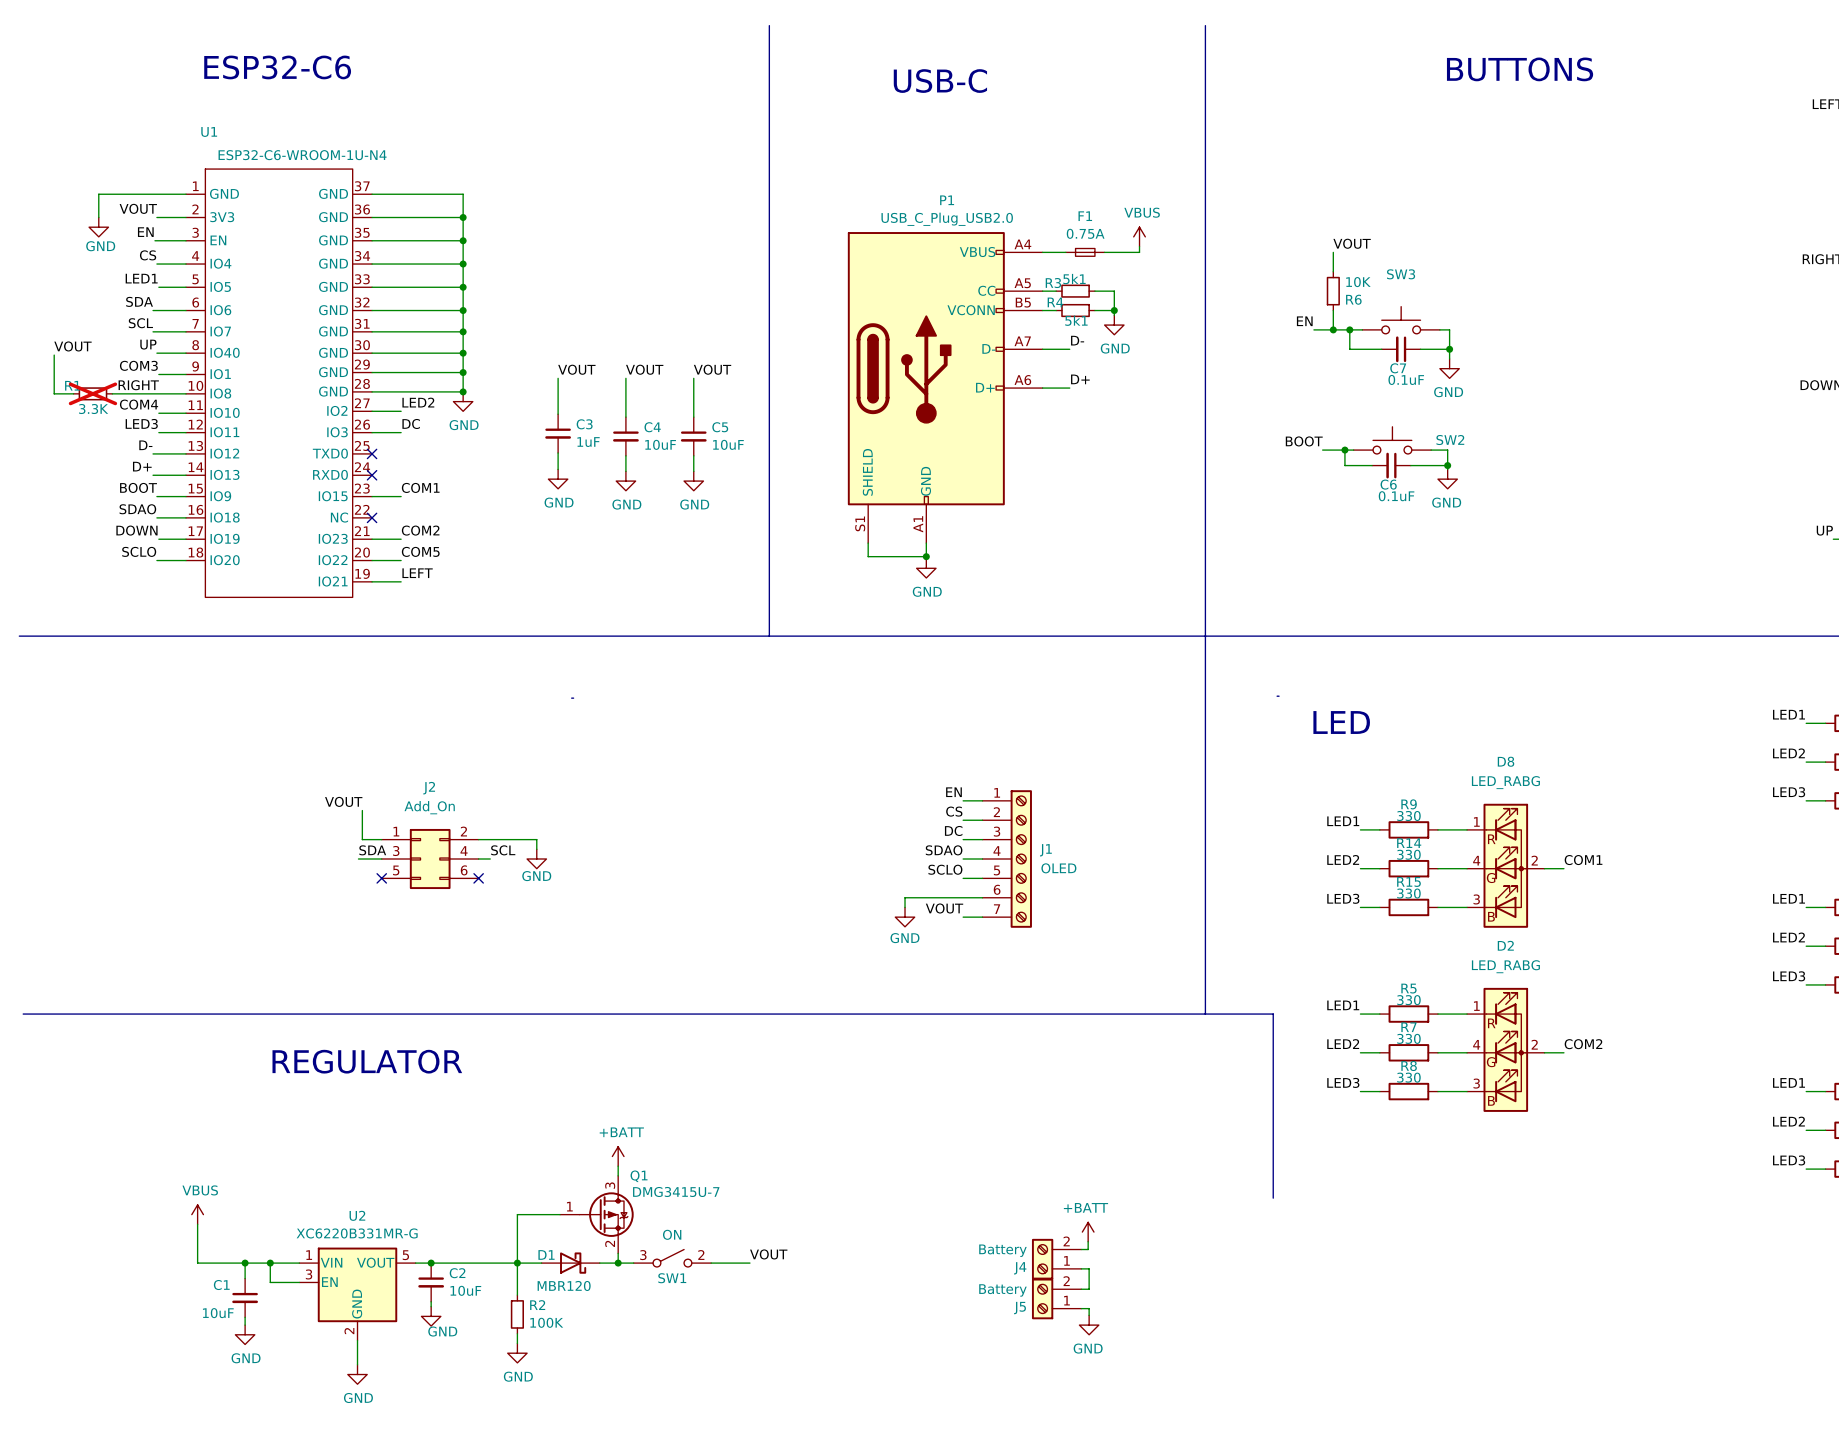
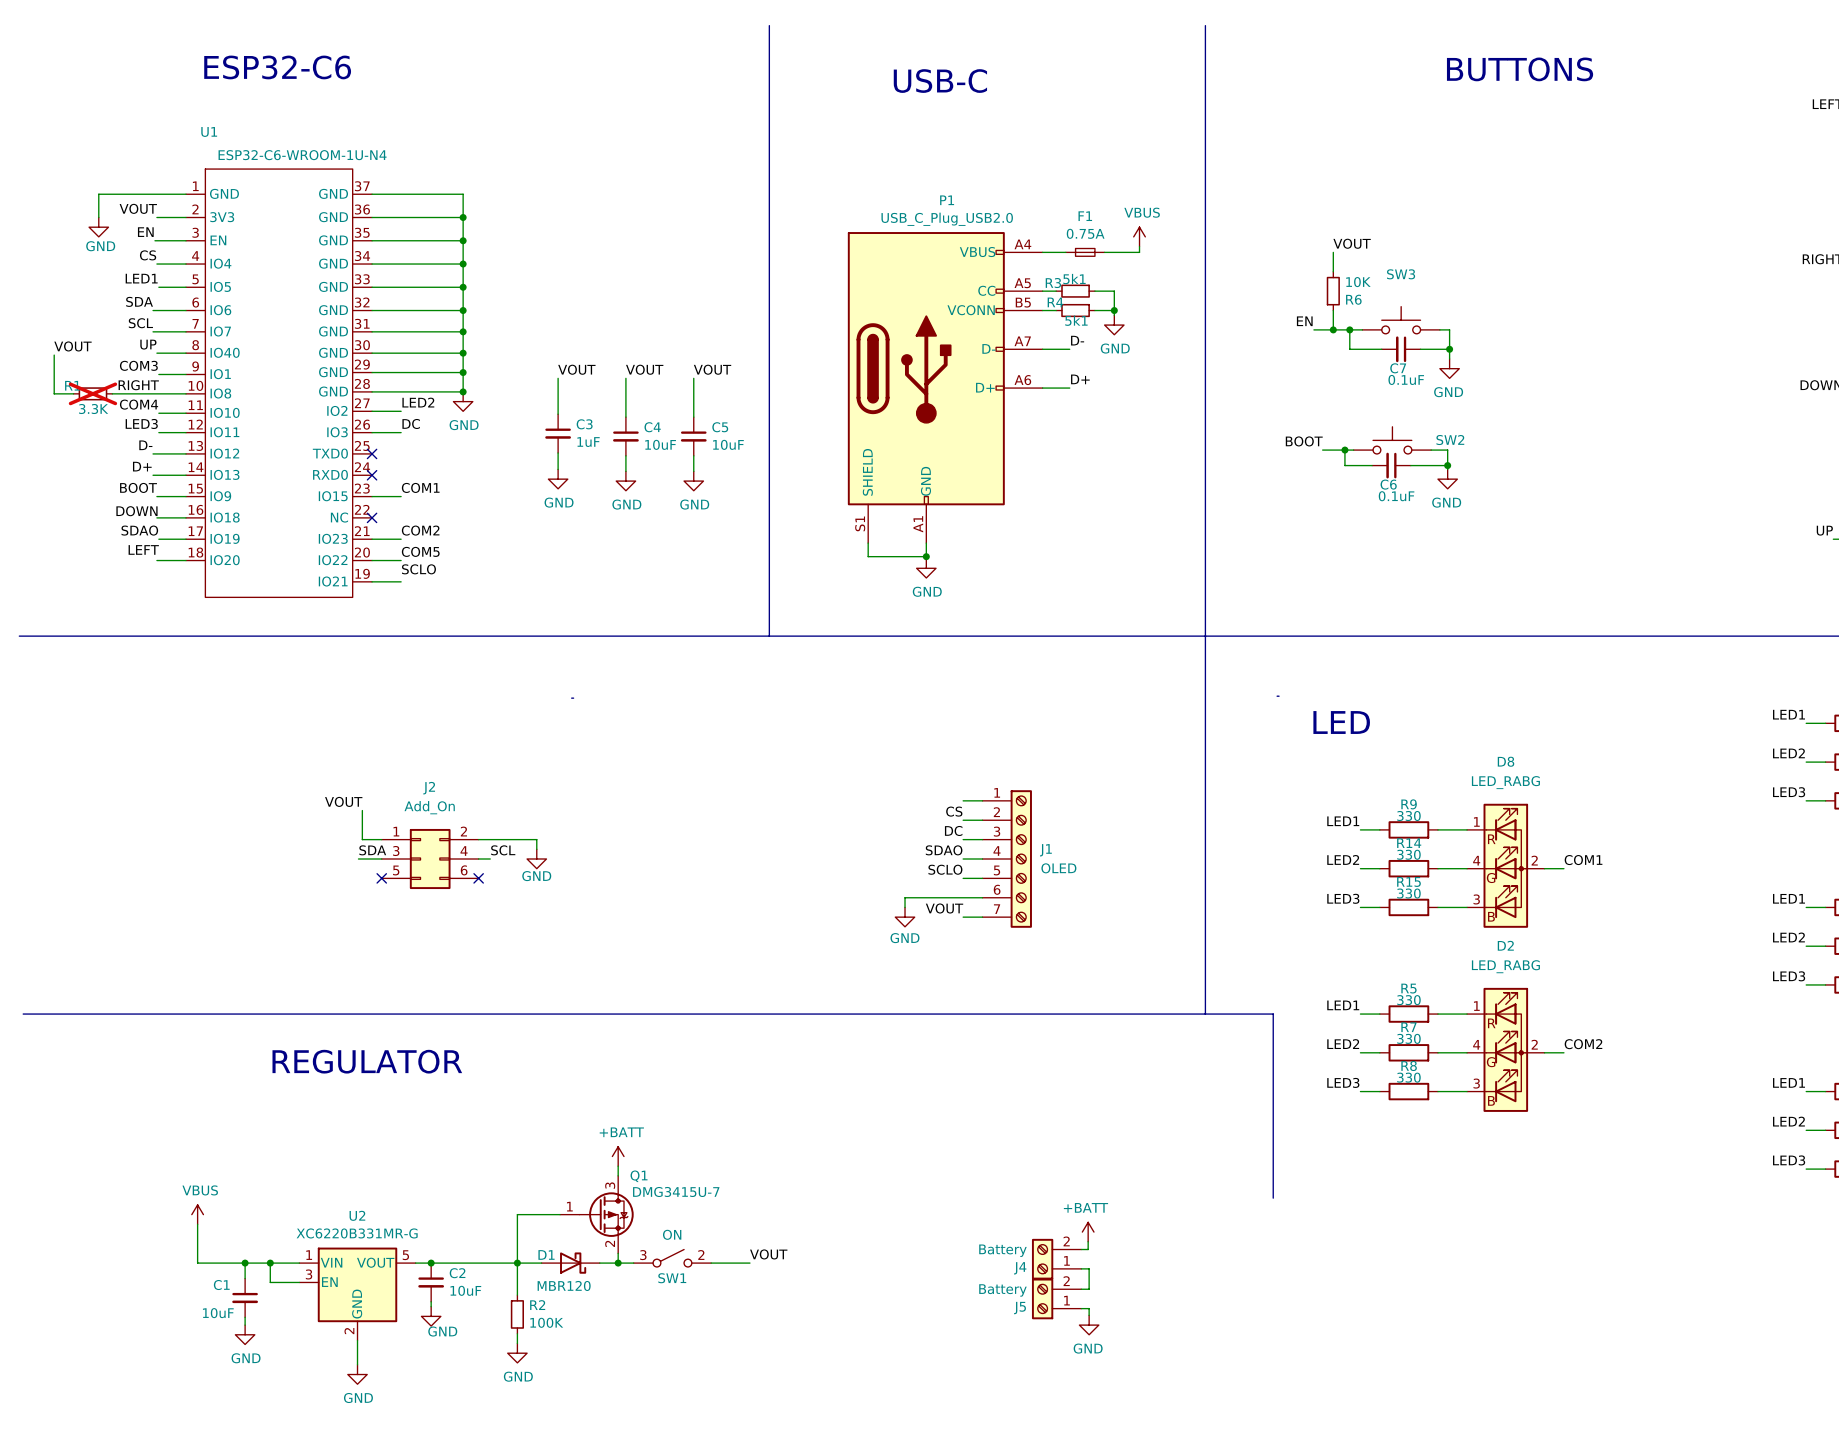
label: SDAO (137, 509) -> DOWN (136, 511)
label: DOWN (136, 530) -> SDAO (139, 530)
label: SCLO (139, 551) -> LEFT (143, 549)
label: LEFT (417, 573) -> SCLO (418, 569)
label: EN (953, 792) -> none

